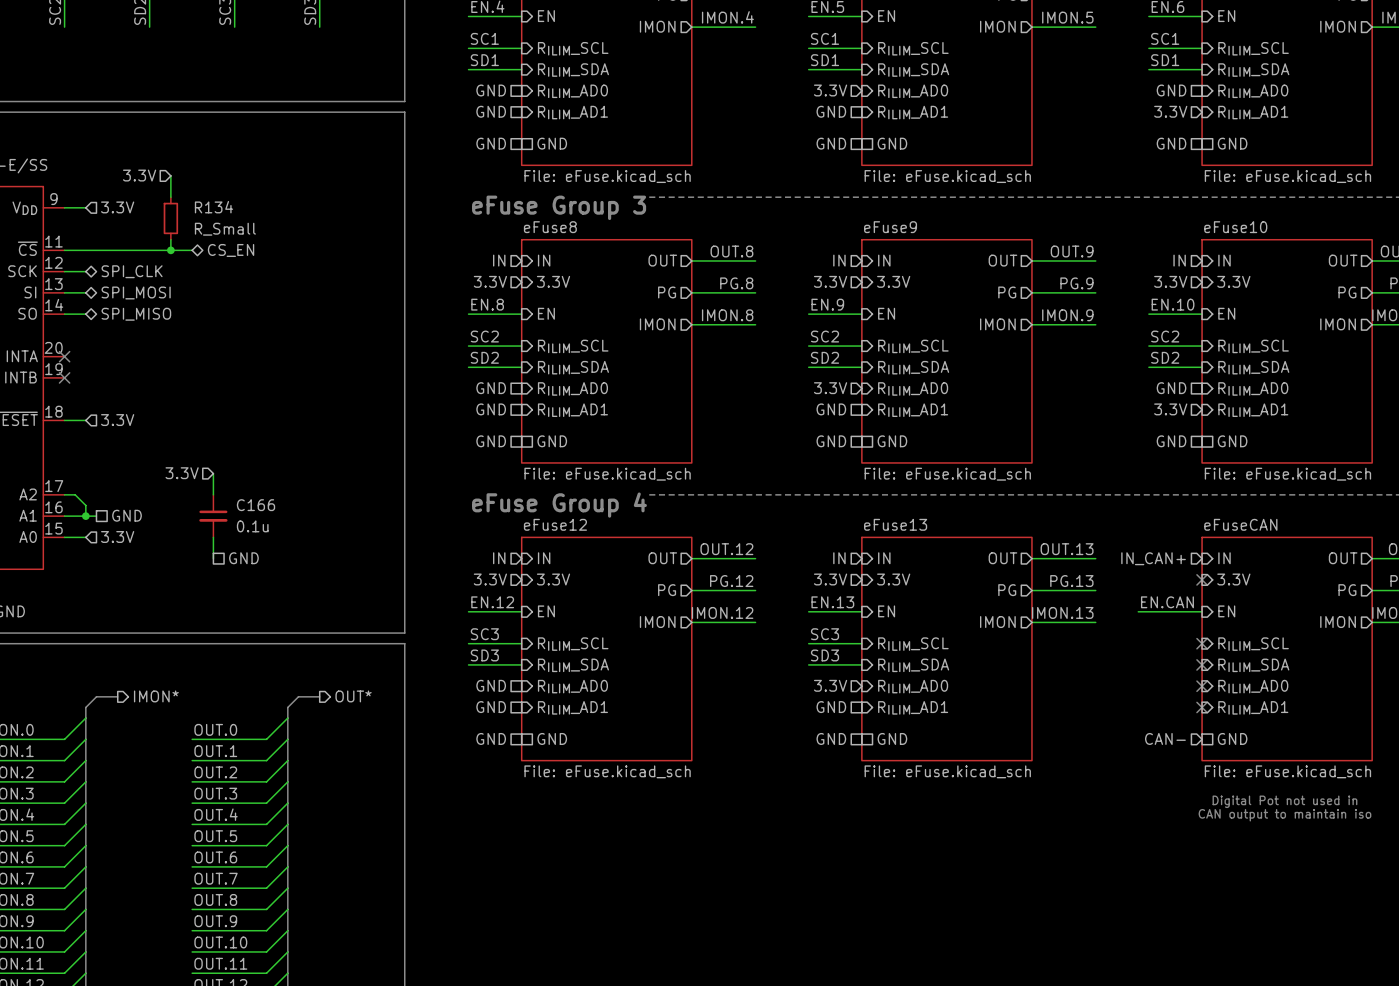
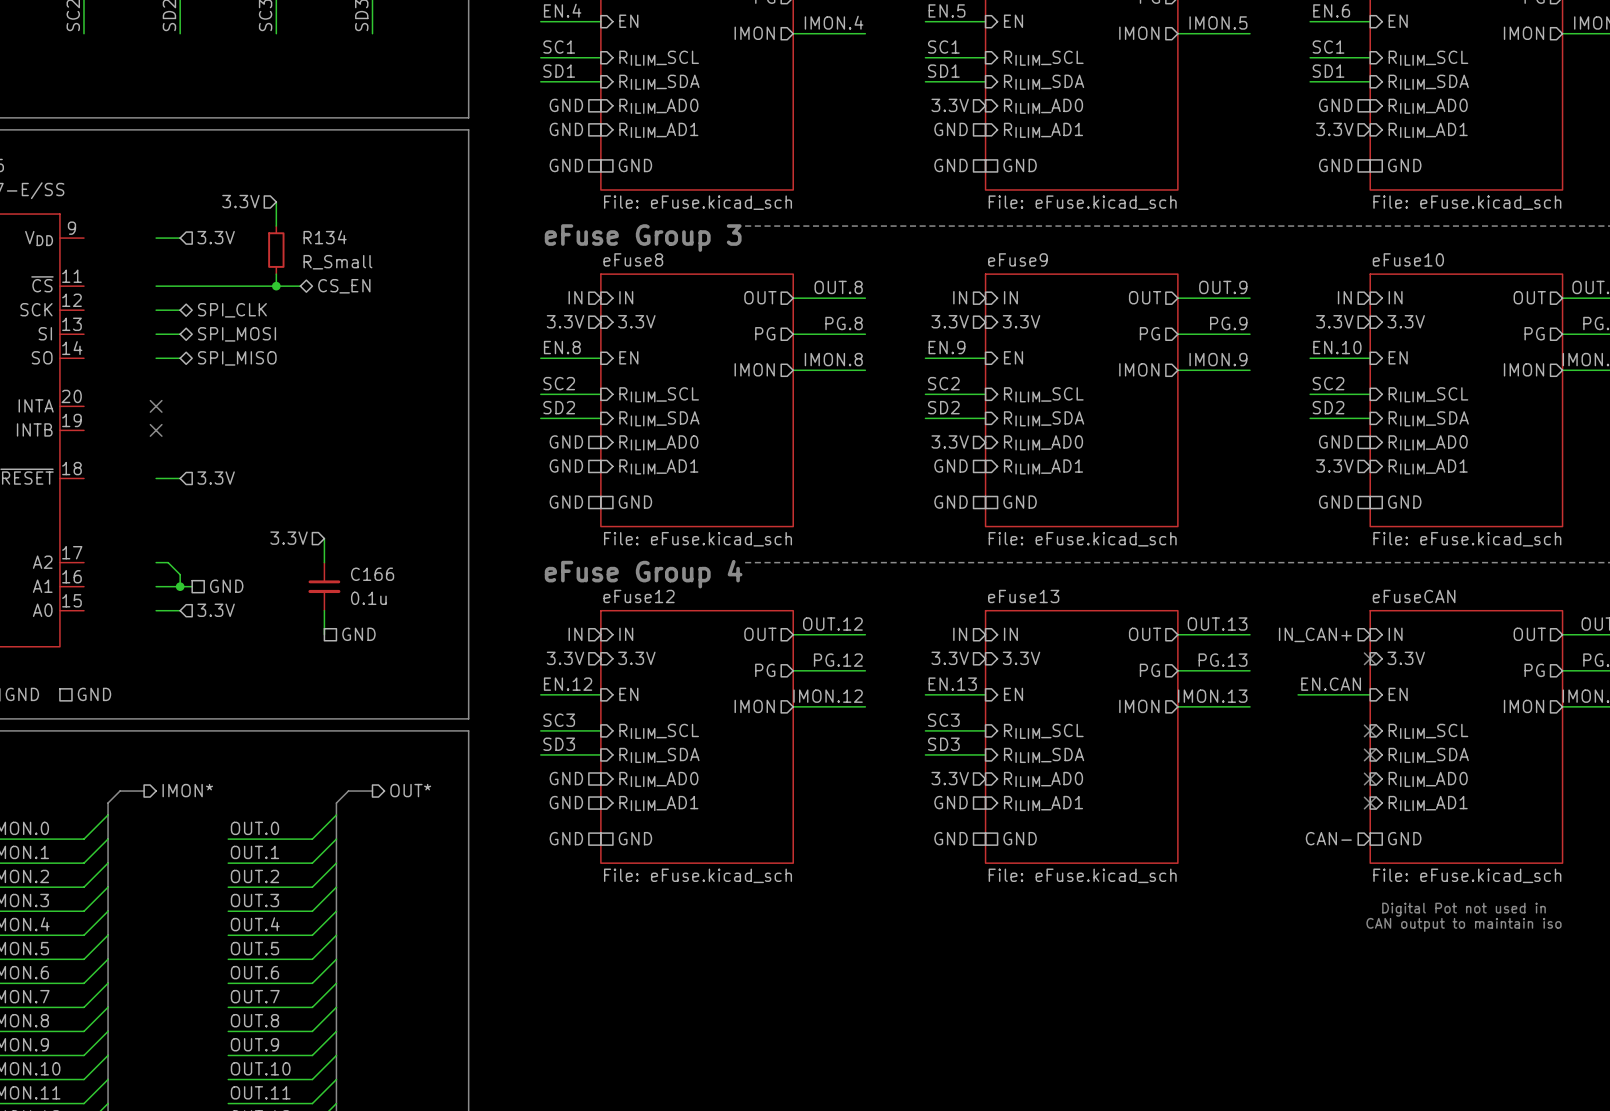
hierarchical label: 3.3V (139, 175) -> none
wire: (170, 175) (170, 197) -> (276, 202) (276, 226)
hierarchical label: none -> 3.3V (240, 201)
wire: (64, 207) (85, 207) -> (156, 238) (180, 238)
hierarchical label: 3.3V (117, 207) -> none
hierarchical label: none -> 3.3V (216, 237)
R134 position: (170, 218) -> (276, 250)
wire: (170, 239) (170, 250) -> (276, 274) (276, 286)
wire: (64, 250) (128, 250) -> (228, 286) (300, 286)
junction: (170, 250) -> none
hierarchical label position: CS_EN (231, 250) -> CS_EN (344, 286)
junction: none -> (276, 286)
wire: (64, 271) (85, 271) -> (156, 310) (180, 310)
hierarchical label position: SPI_CLK (132, 271) -> SPI_CLK (232, 310)
wire: (64, 292) (85, 292) -> (156, 334) (180, 334)
hierarchical label position: SPI_MOSI (136, 292) -> SPI_MOSI (237, 334)
wire: (64, 314) (85, 314) -> (156, 358) (180, 358)
hierarchical label position: SPI_MISO (136, 314) -> SPI_MISO (237, 358)
no-connect mark: (64, 356) -> none
no-connect mark: none -> (156, 406)
no-connect mark: (64, 377) -> none
no-connect mark: none -> (156, 430)
wire: (64, 420) (85, 420) -> (156, 478) (180, 478)
hierarchical label: 3.3V (117, 420) -> none
hierarchical label: none -> 3.3V (216, 478)
hierarchical label: 3.3V (182, 473) -> none
wire: (213, 473) (213, 494) -> (324, 538) (324, 562)
hierarchical label: none -> 3.3V (289, 538)
wire: (64, 494) (75, 494) (85, 505) (85, 516) -> (156, 562) (168, 562) (180, 574) (180, 586)
hierarchical label: GND (127, 515) -> none
hierarchical label: none -> GND (226, 586)
wire: (64, 516) (96, 516) -> (156, 586) (192, 586)
junction: (85, 516) -> none
junction: none -> (180, 586)
C166 position: (213, 516) -> (324, 586)
hierarchical label: 3.3V (117, 536) -> none
hierarchical label: none -> 3.3V (216, 610)
wire: (64, 537) (85, 537) -> (156, 610) (180, 610)
wire: (213, 537) (213, 558) -> (324, 610) (324, 634)
hierarchical label: GND (243, 558) -> none
hierarchical label: none -> GND (358, 634)
hierarchical label: none -> GND (94, 694)

